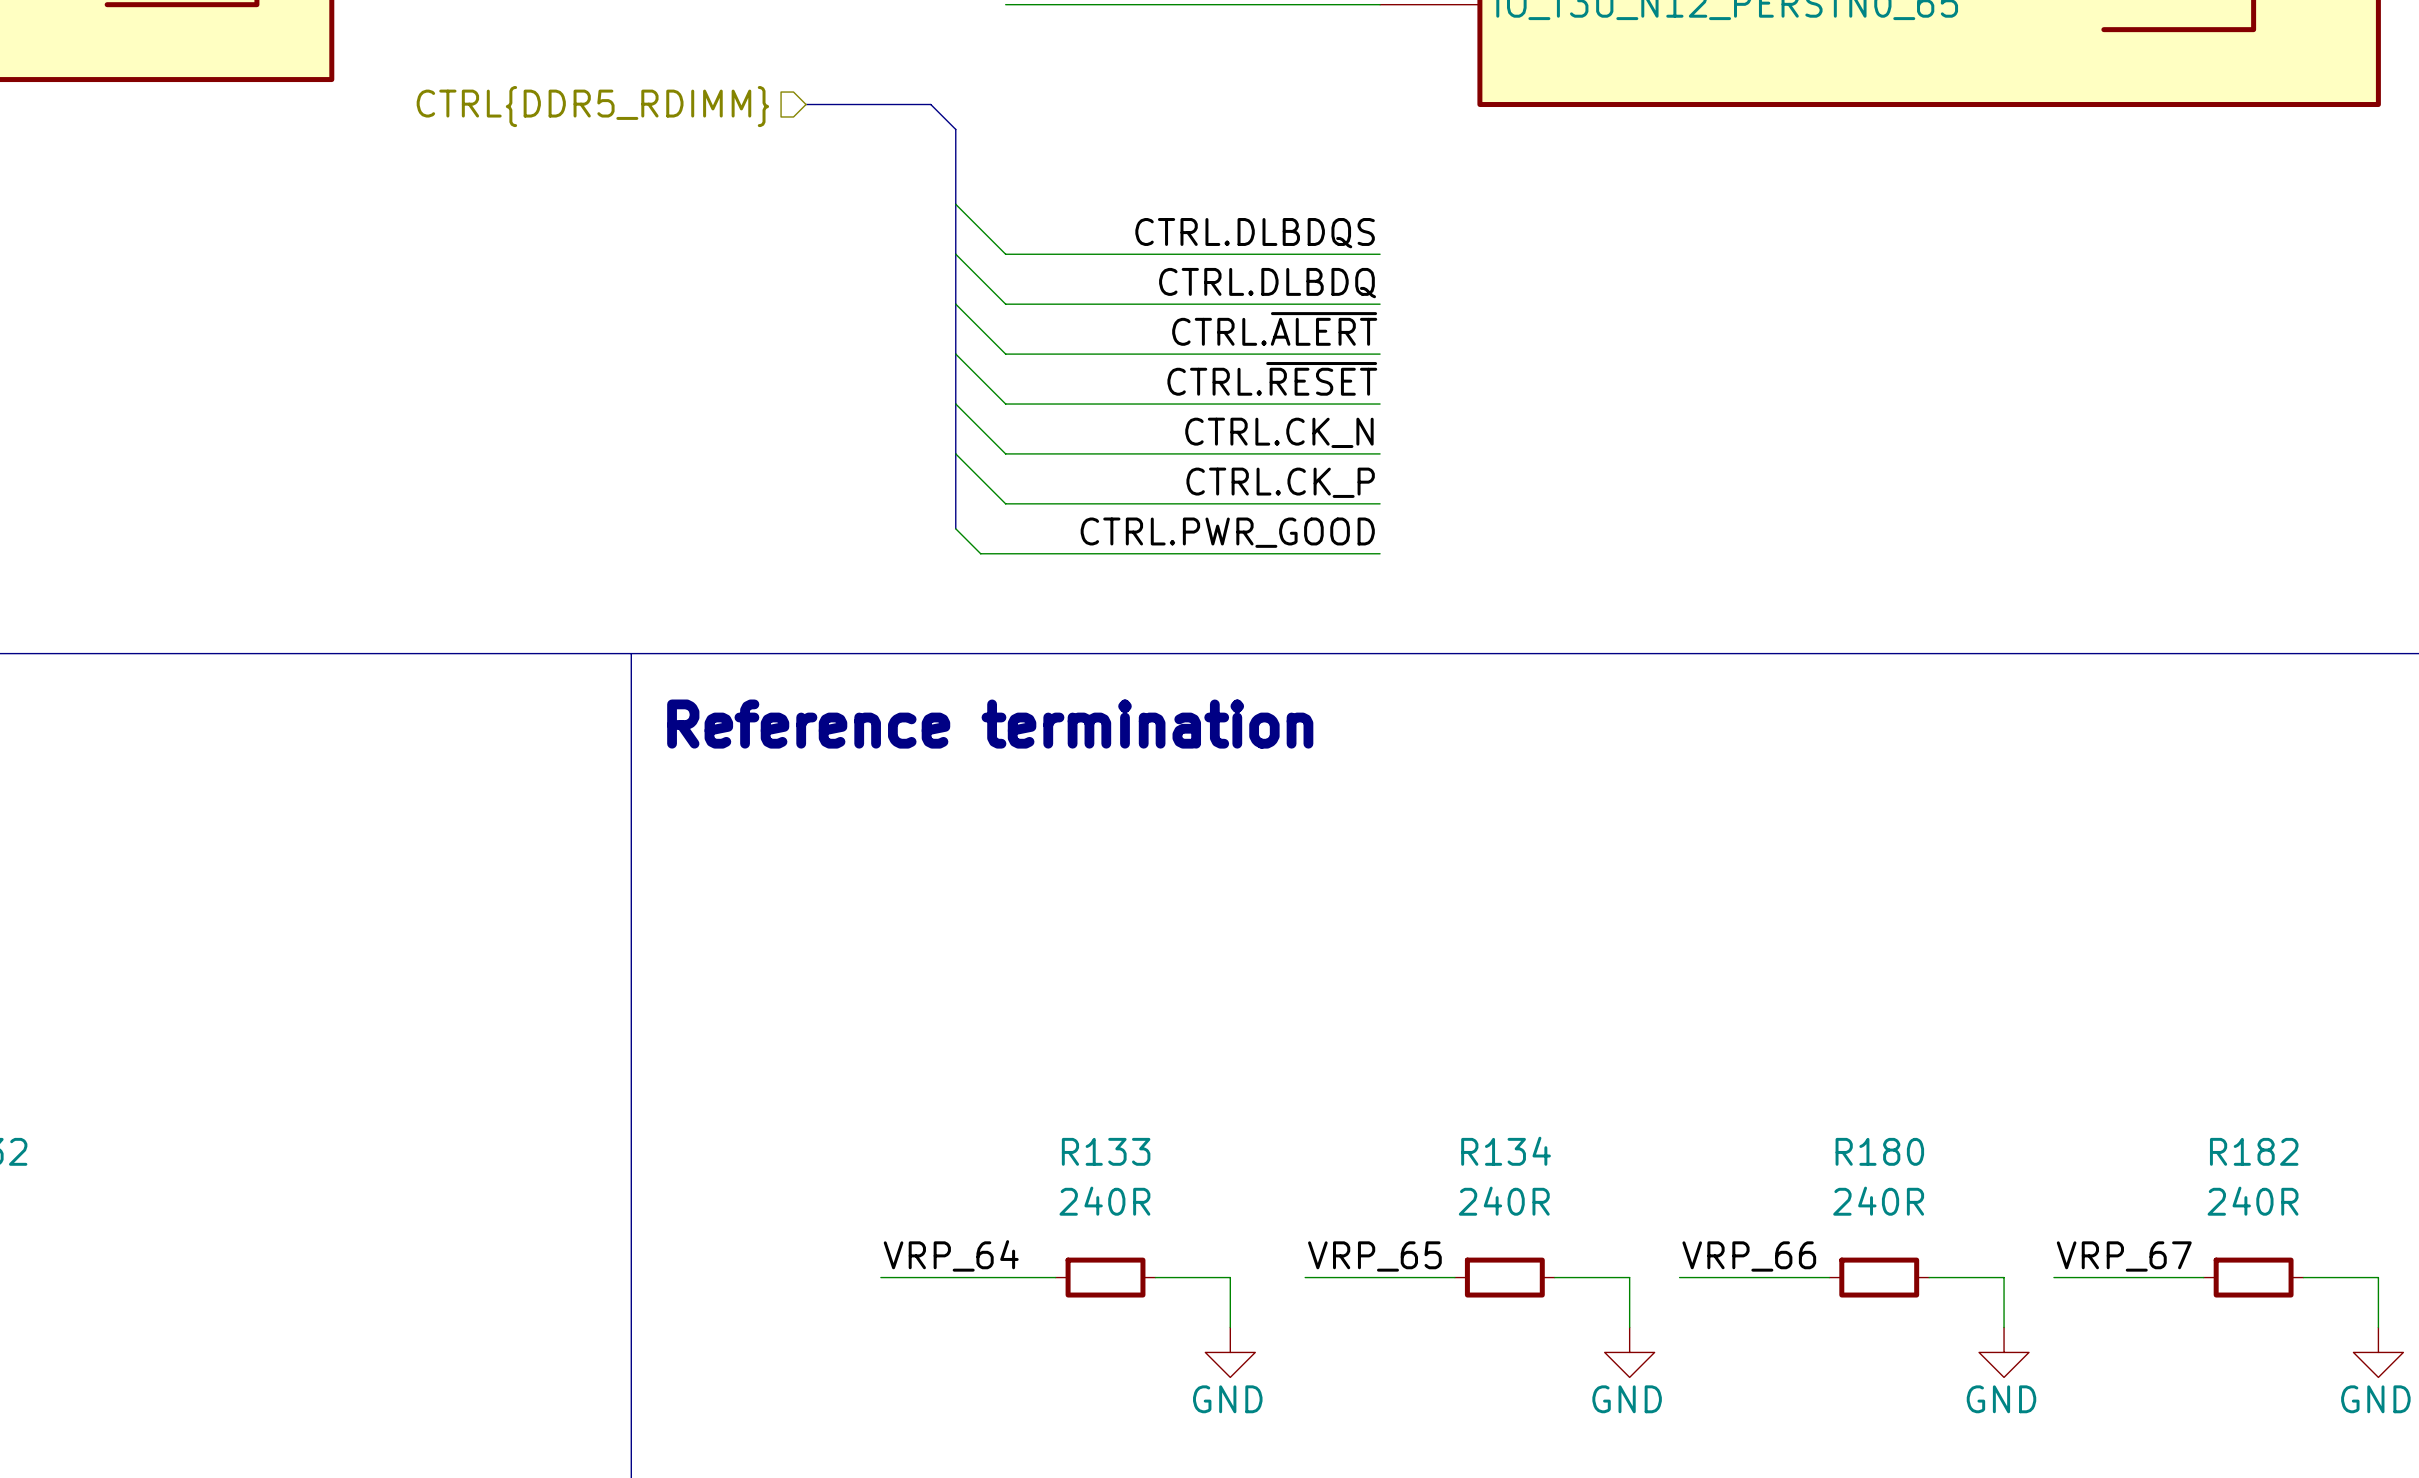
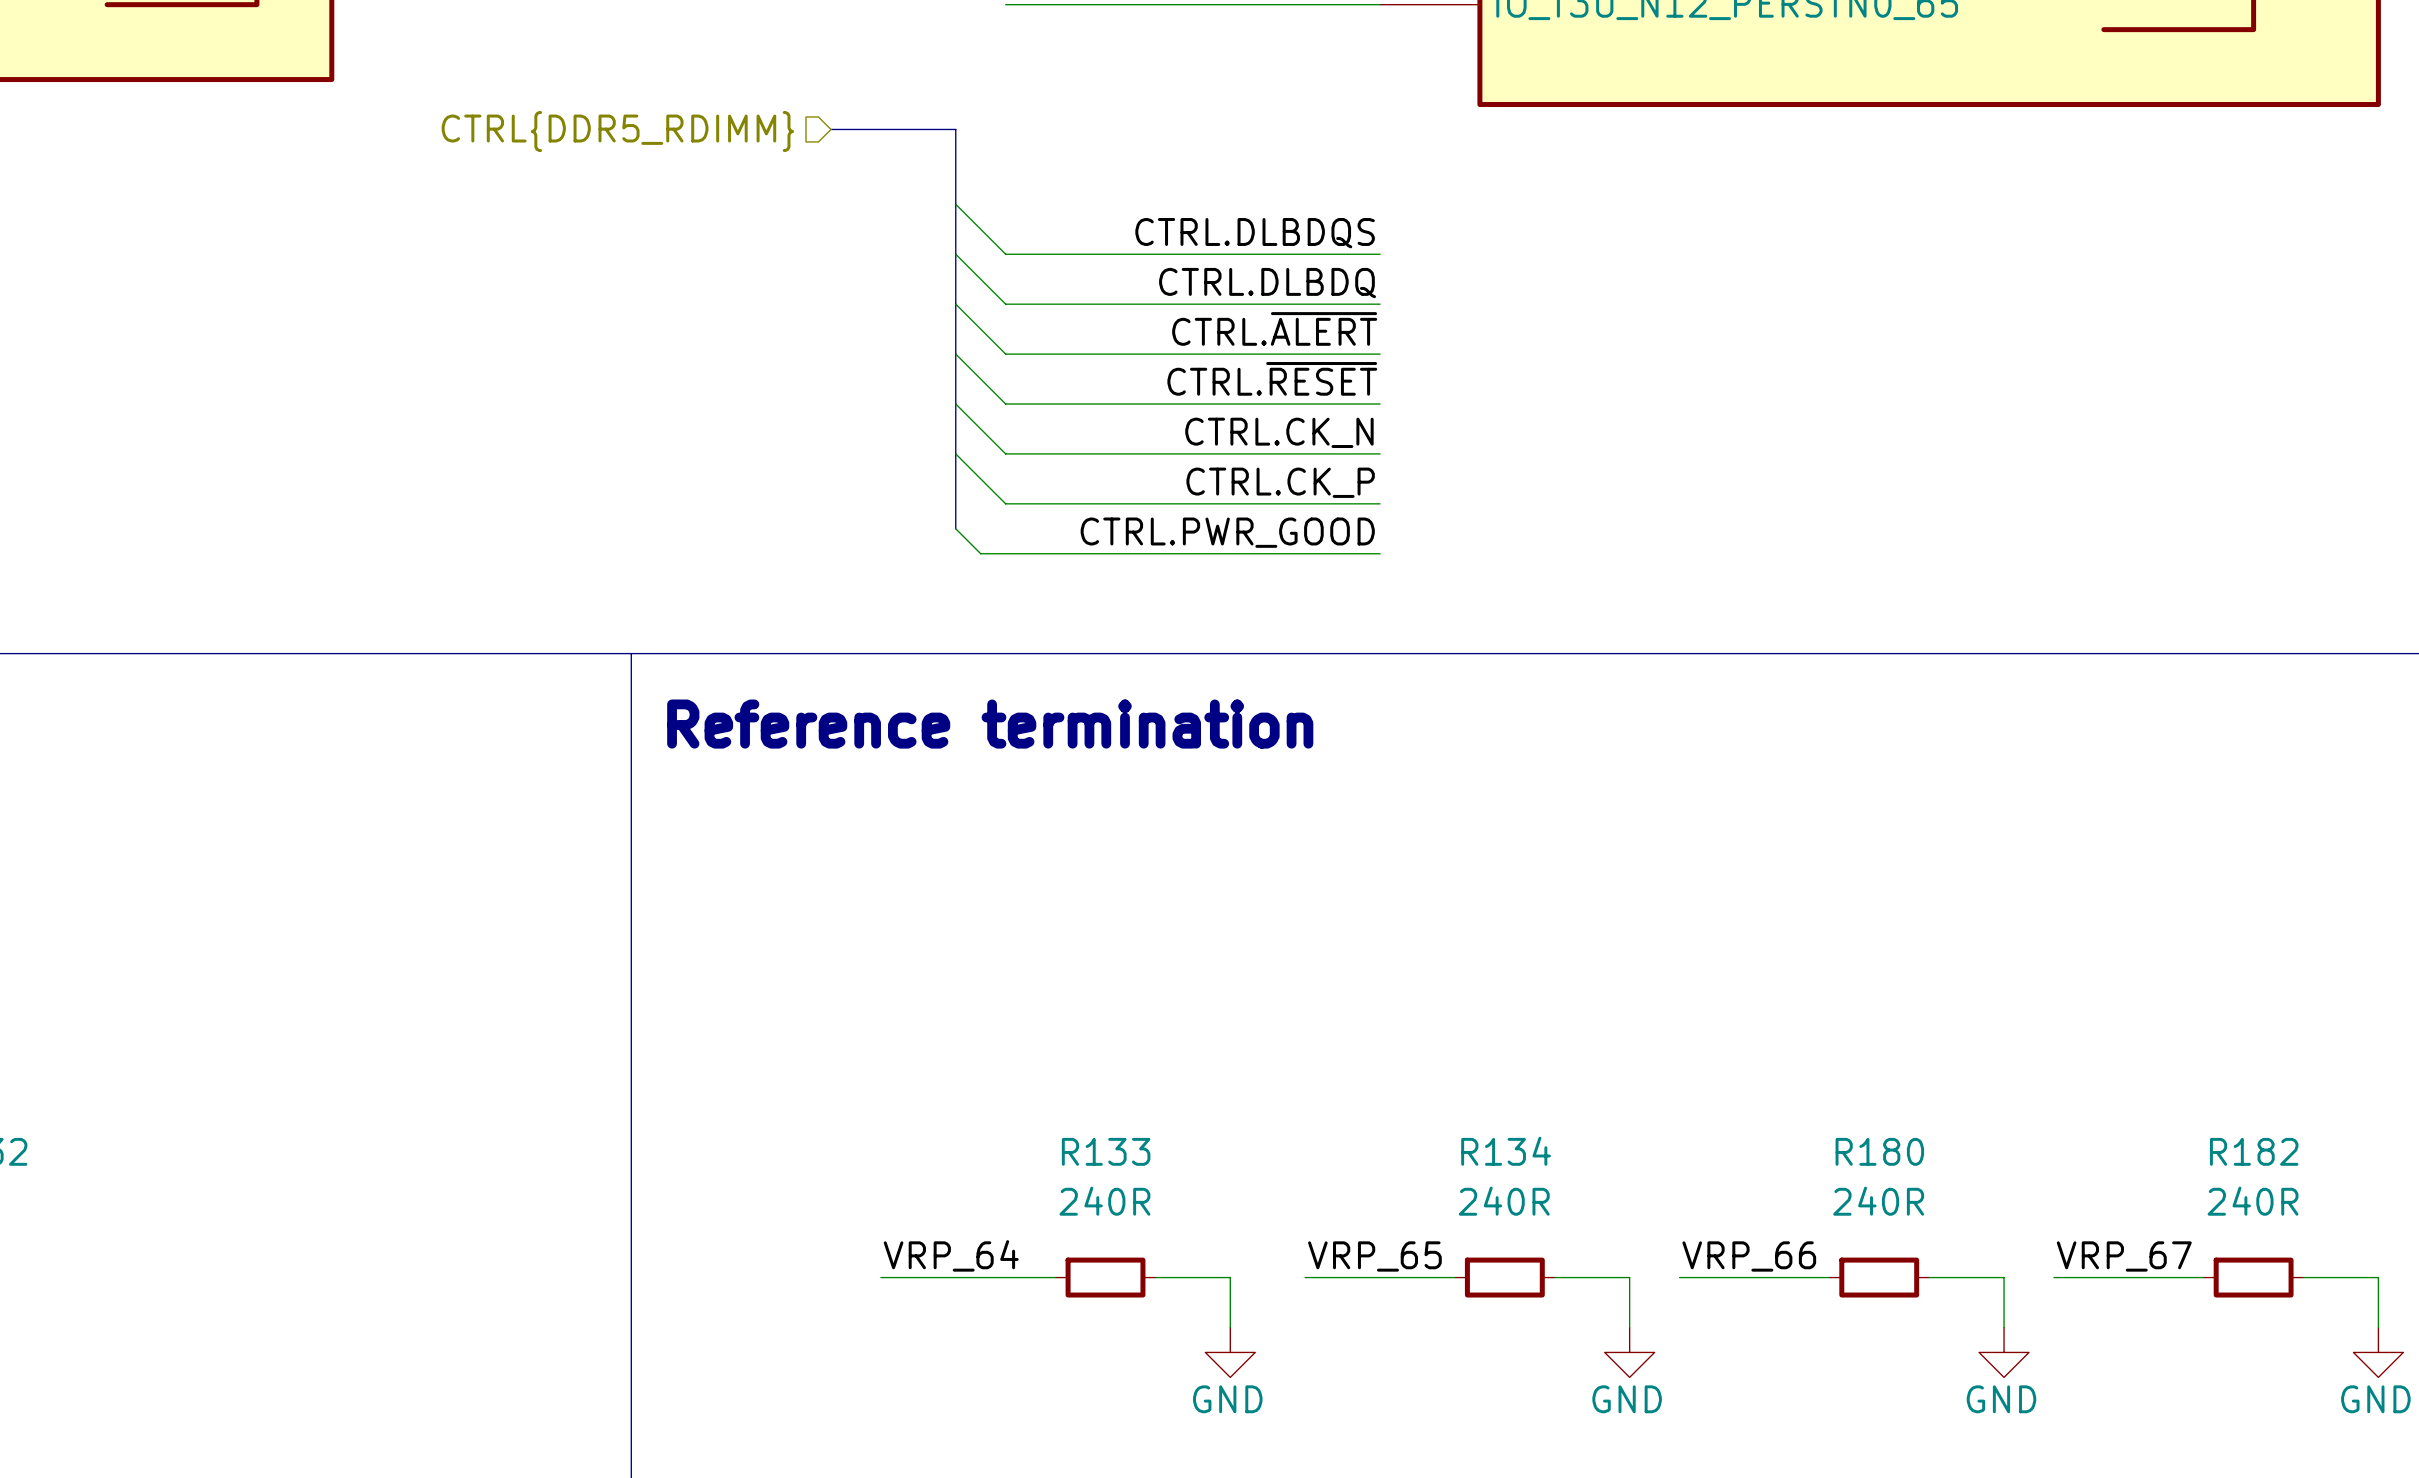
bus: (806, 104) (930, 104) (955, 129) -> (830, 129) (955, 129)
hierarchical label position: CTRL{DDR5_RDIMM} (592, 106) -> CTRL{DDR5_RDIMM} (617, 131)

